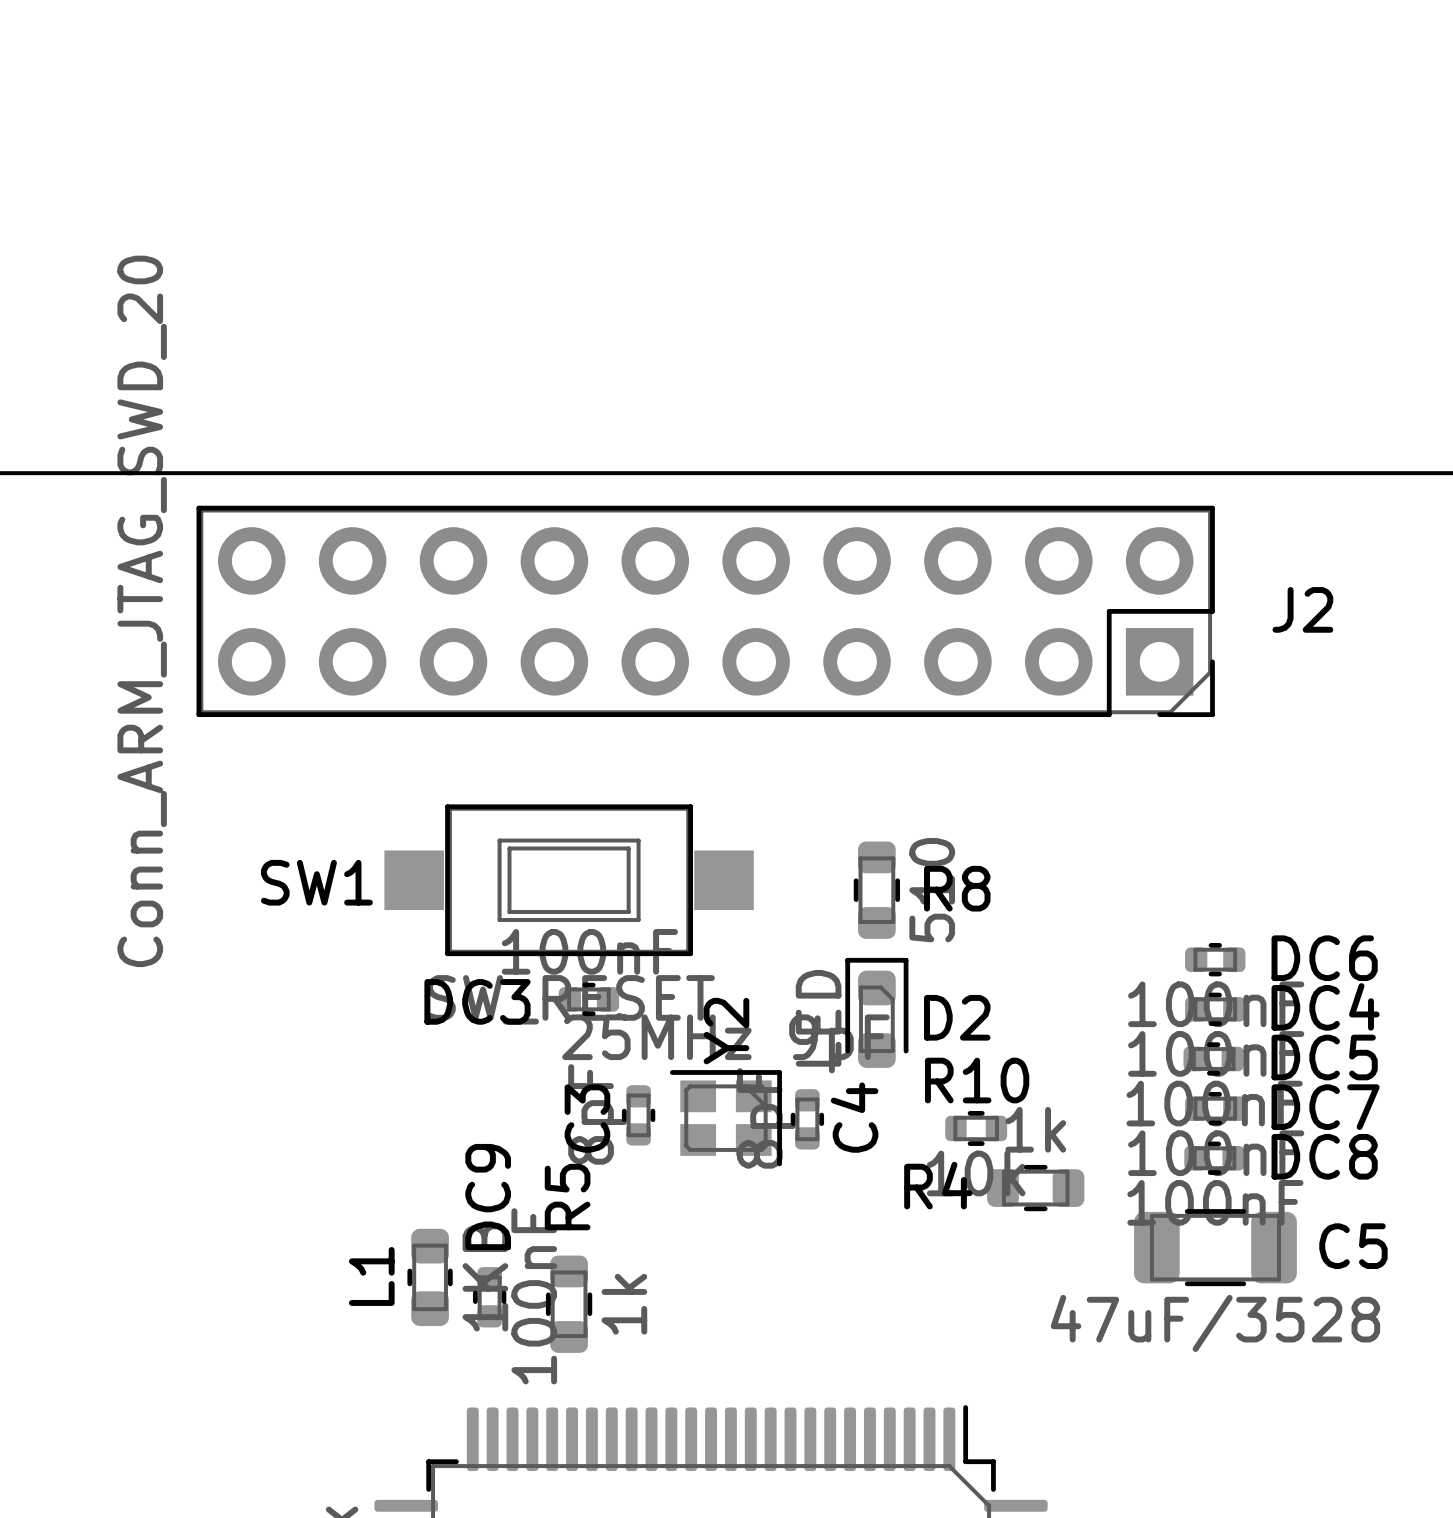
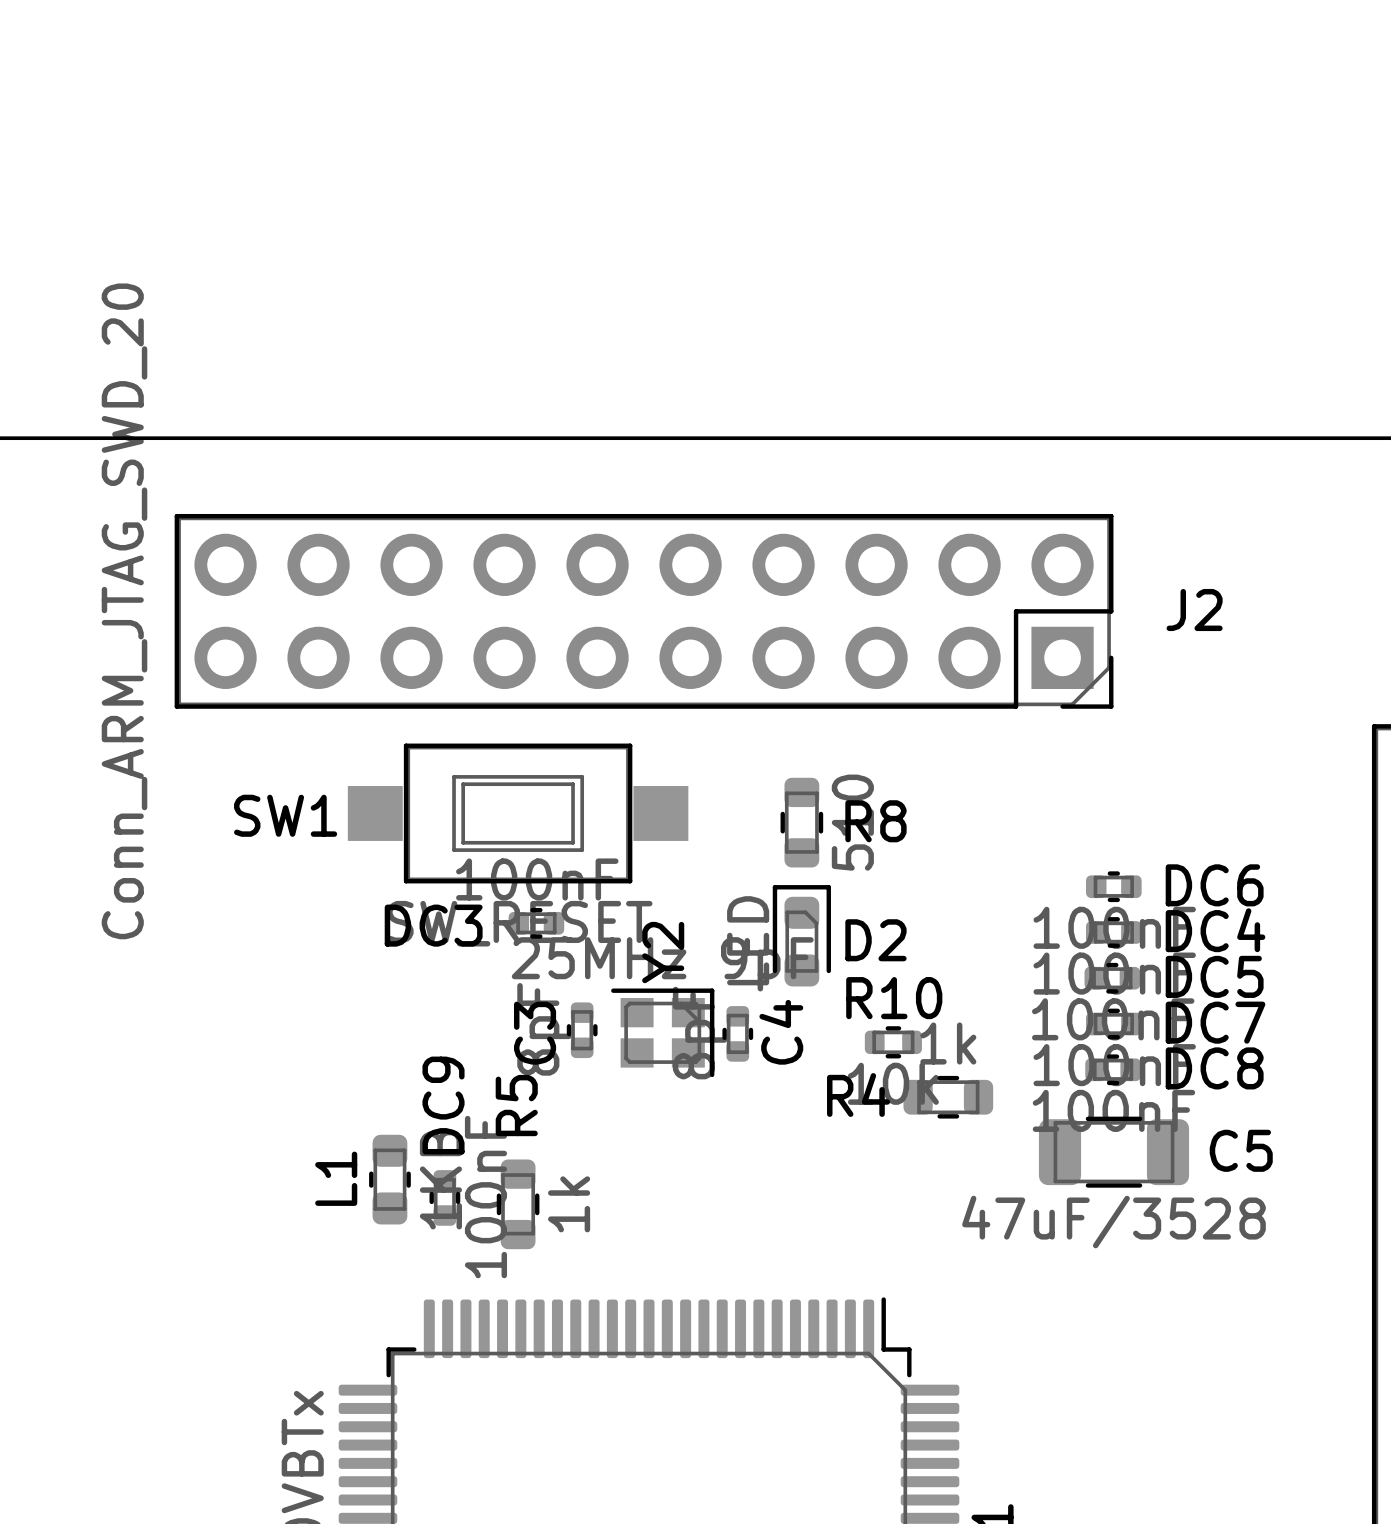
J2 position: (705, 611) -> (644, 611)

